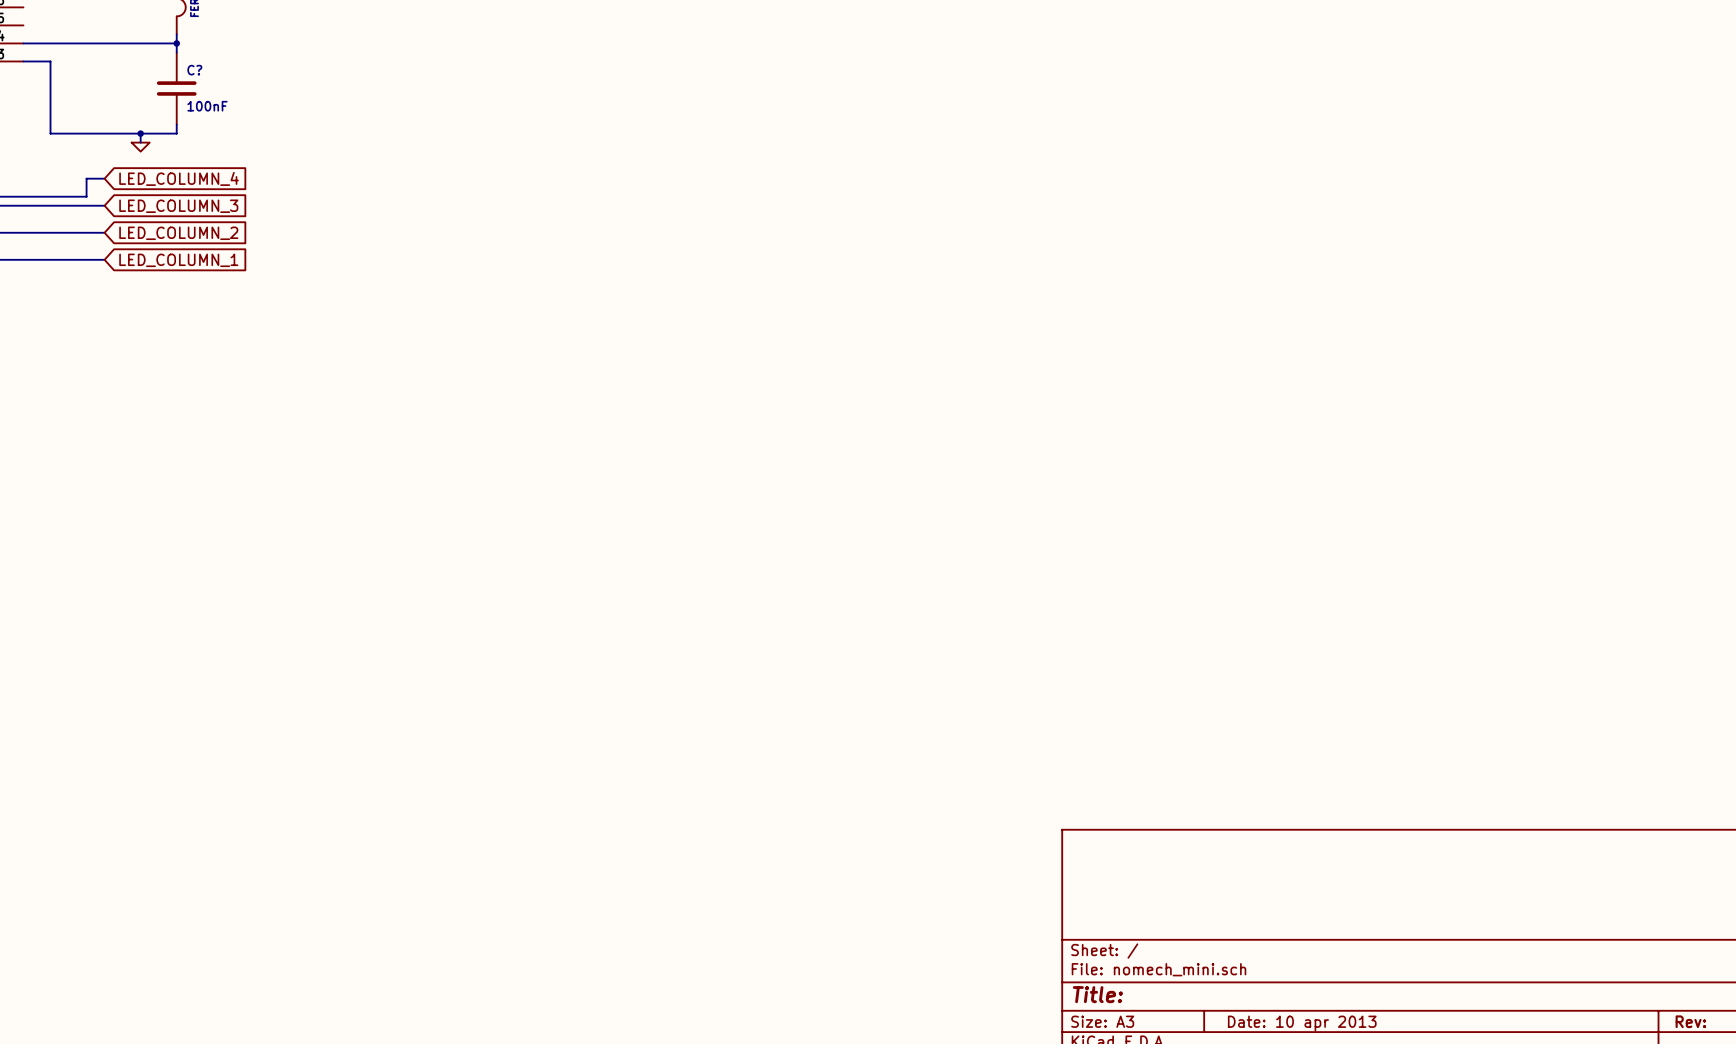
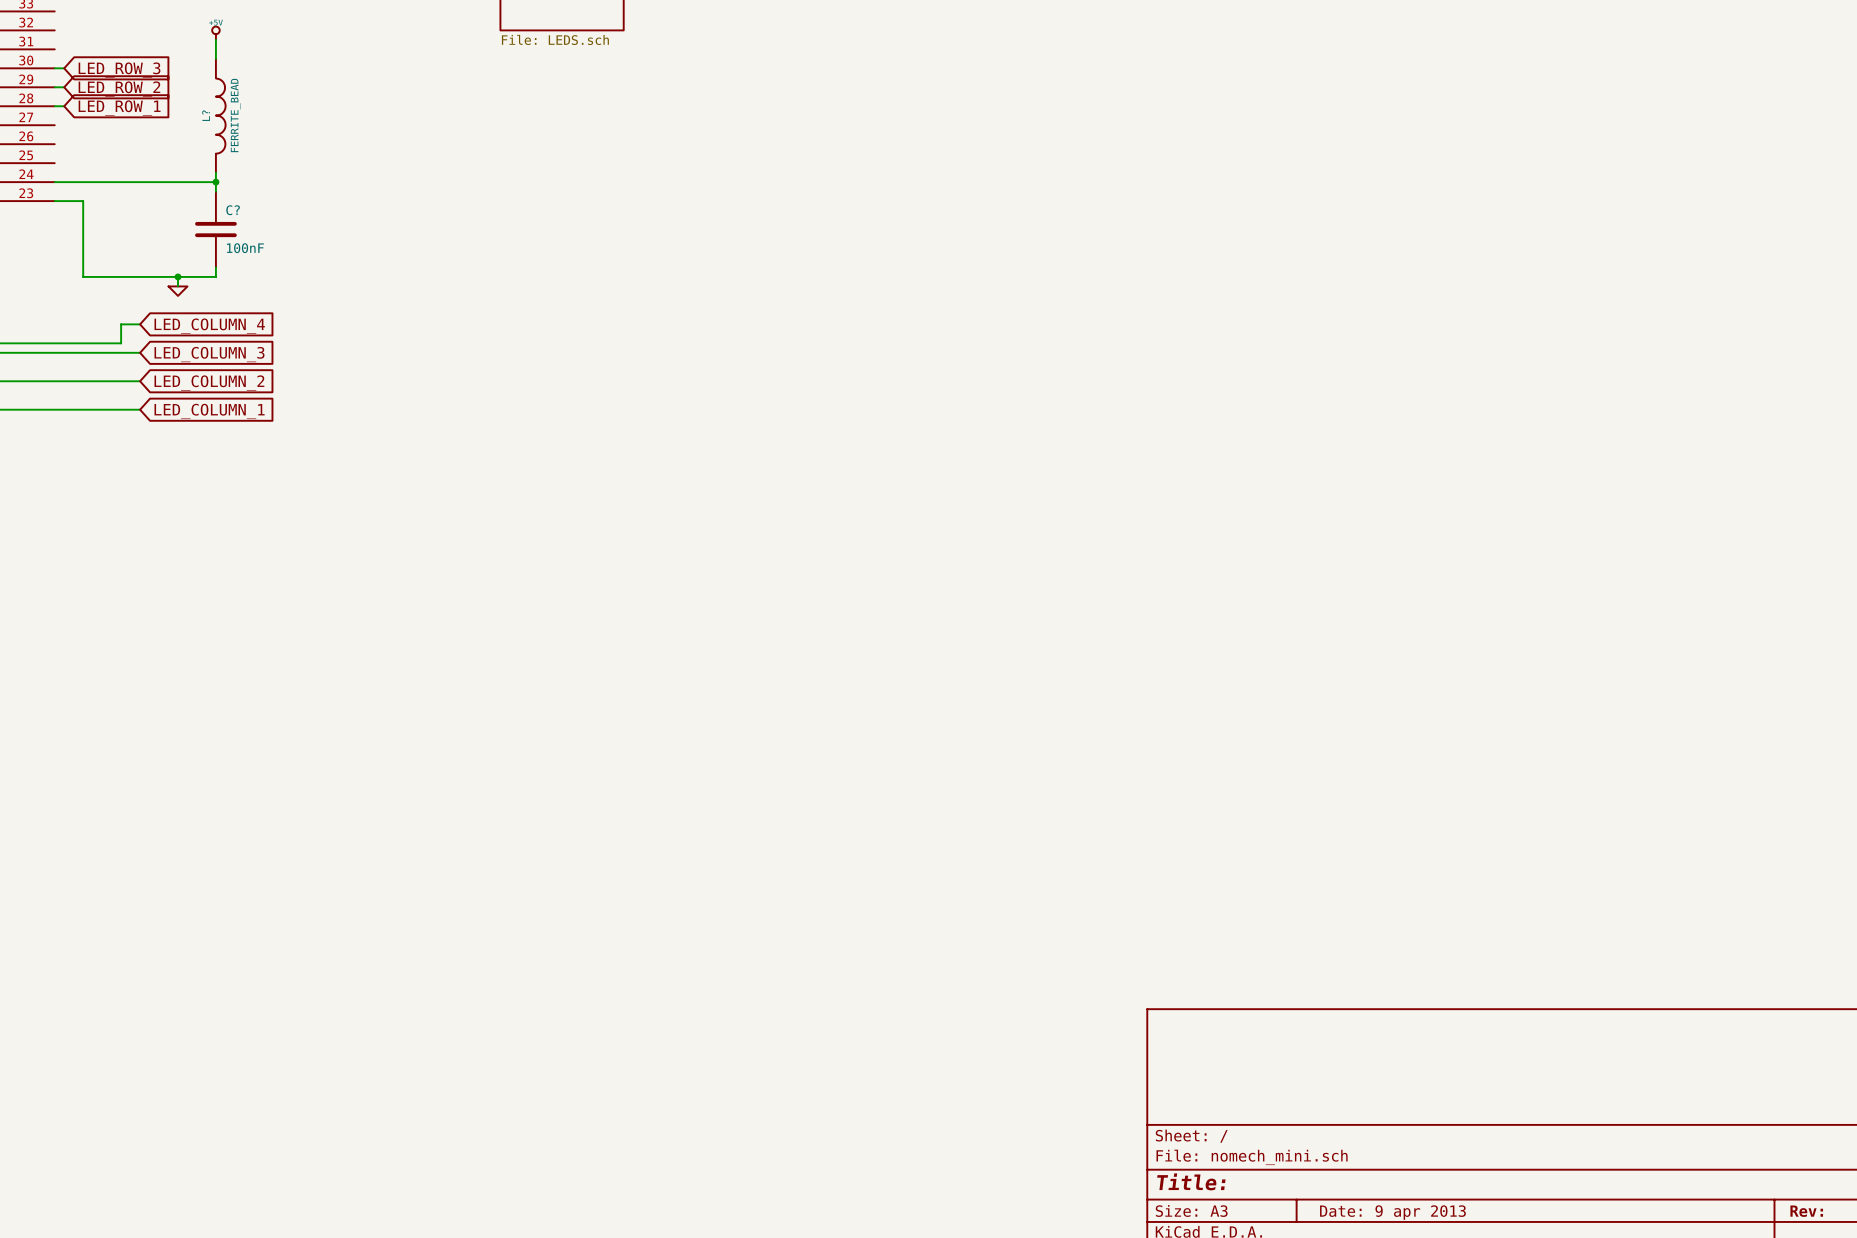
title block: Date: 10 apr 2013 (1302, 1023) -> Date: 9 apr 2013 (1392, 1212)

